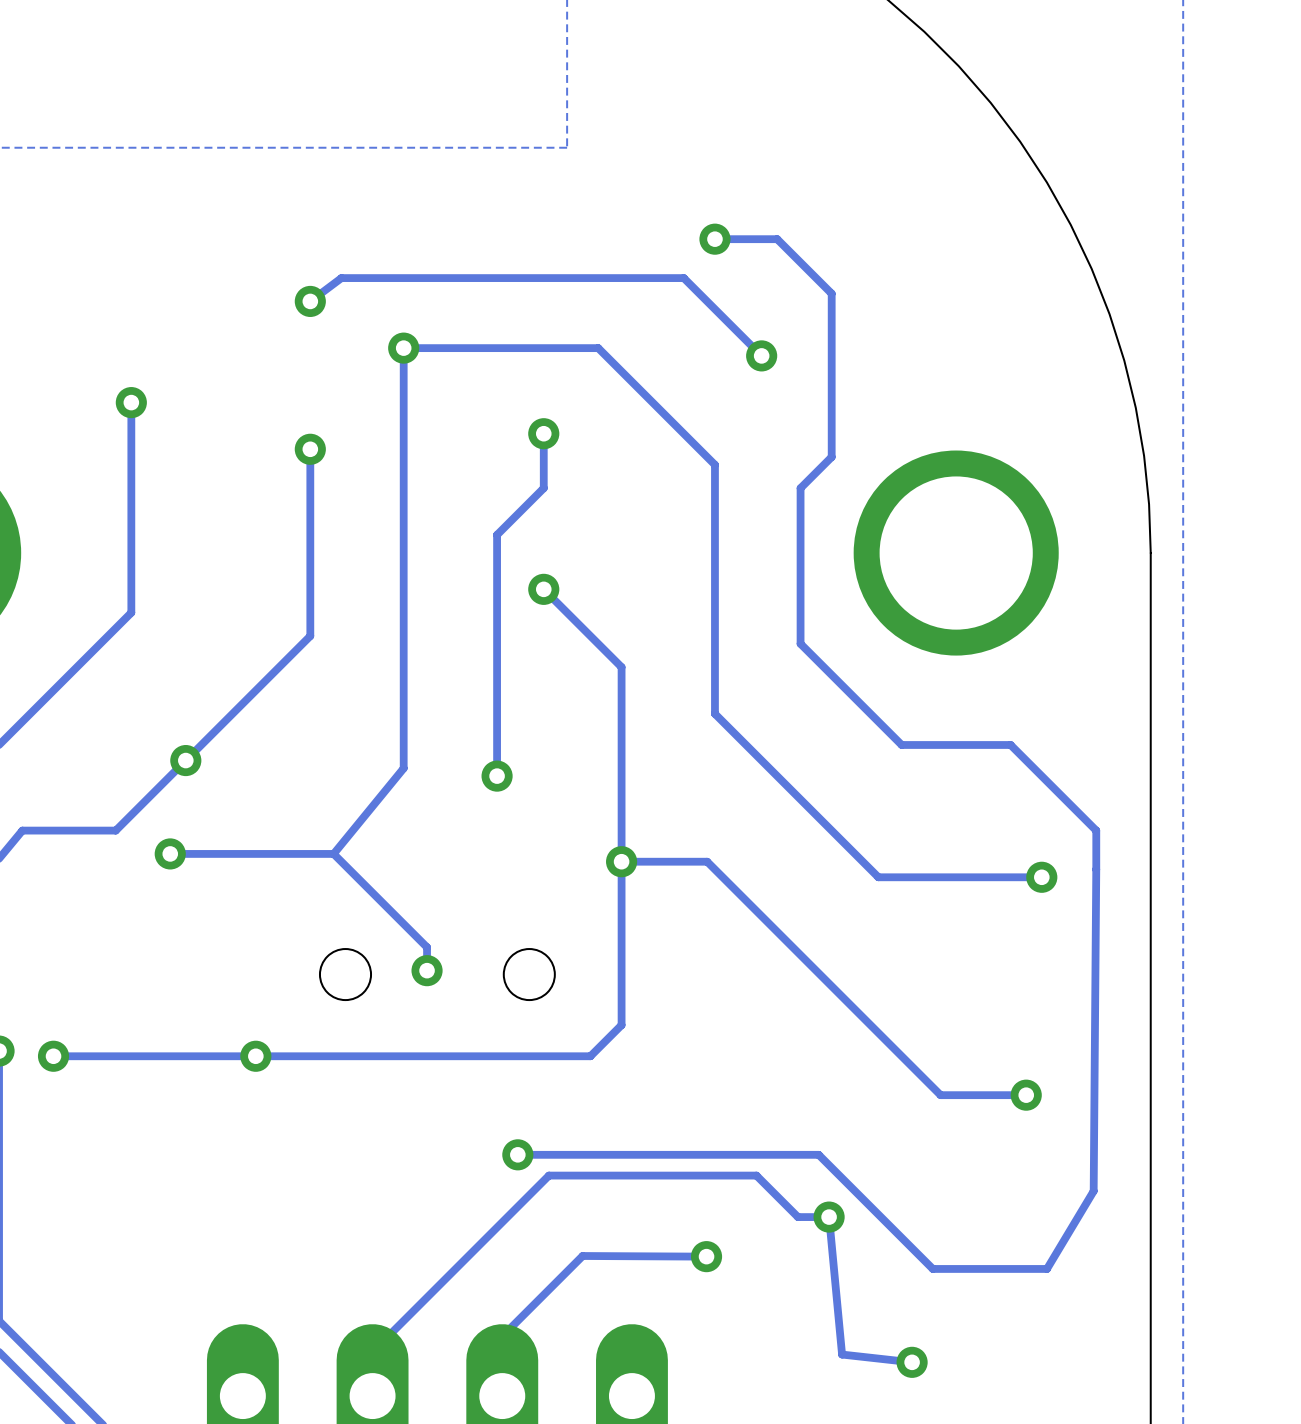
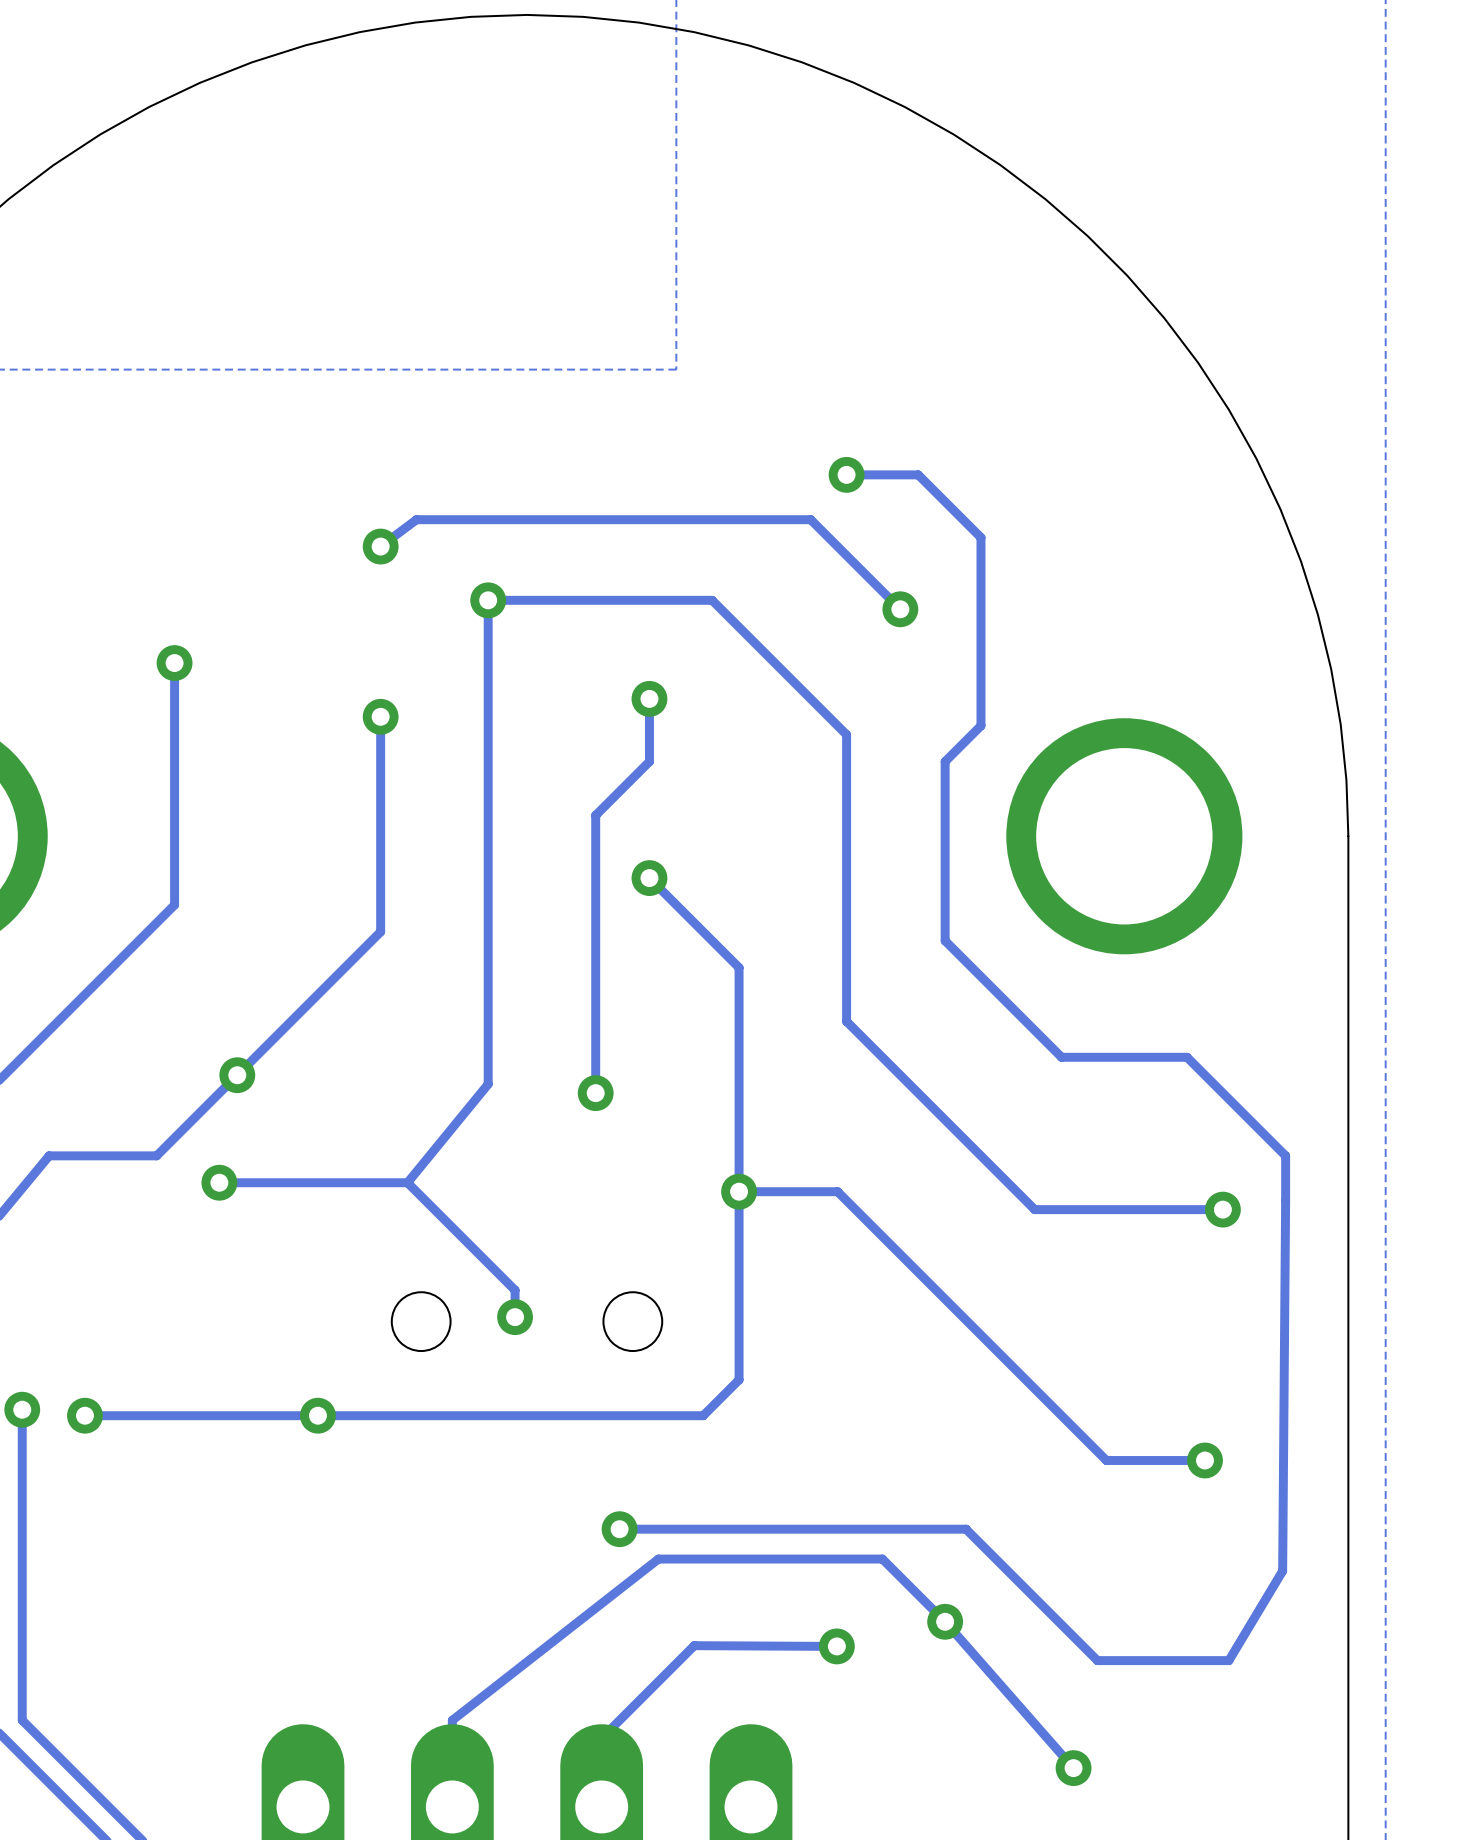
via position: (829, 1217) -> (945, 1621)
track: (372, 1351) (548, 1175) (756, 1175) (797, 1217) (829, 1217) (842, 1354) (912, 1362) -> (452, 1756) (452, 1720) (658, 1559) (882, 1559) (945, 1621) (1073, 1768)

